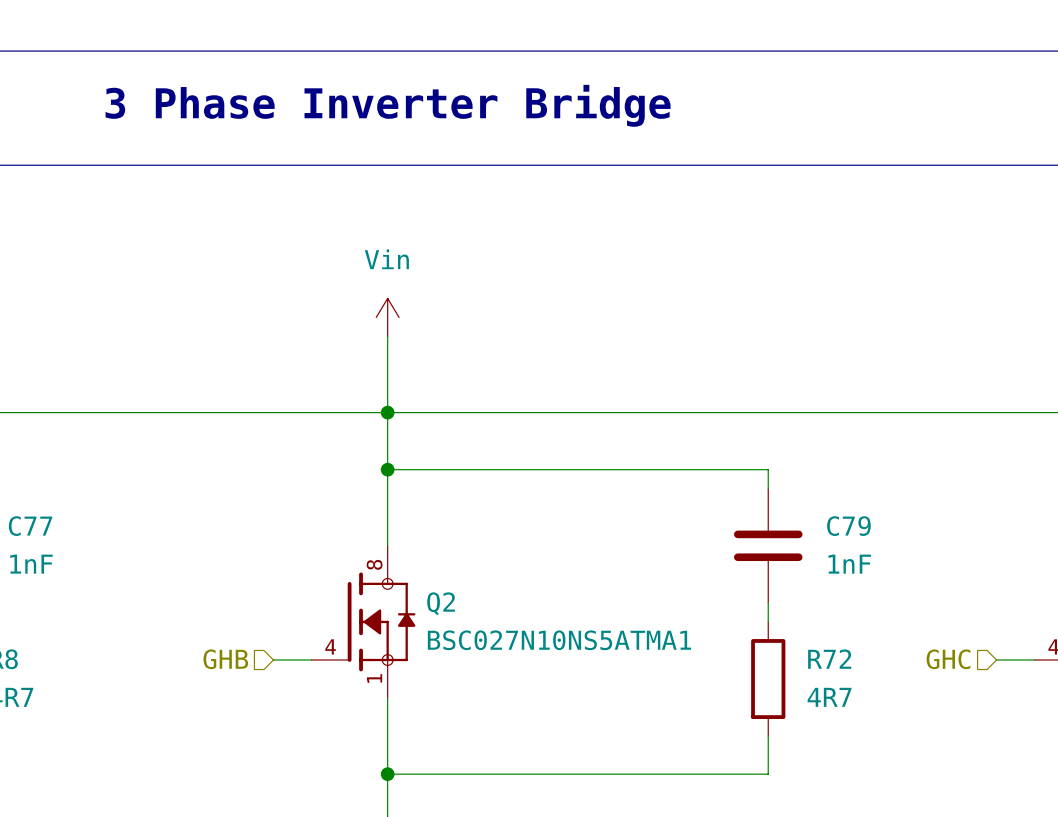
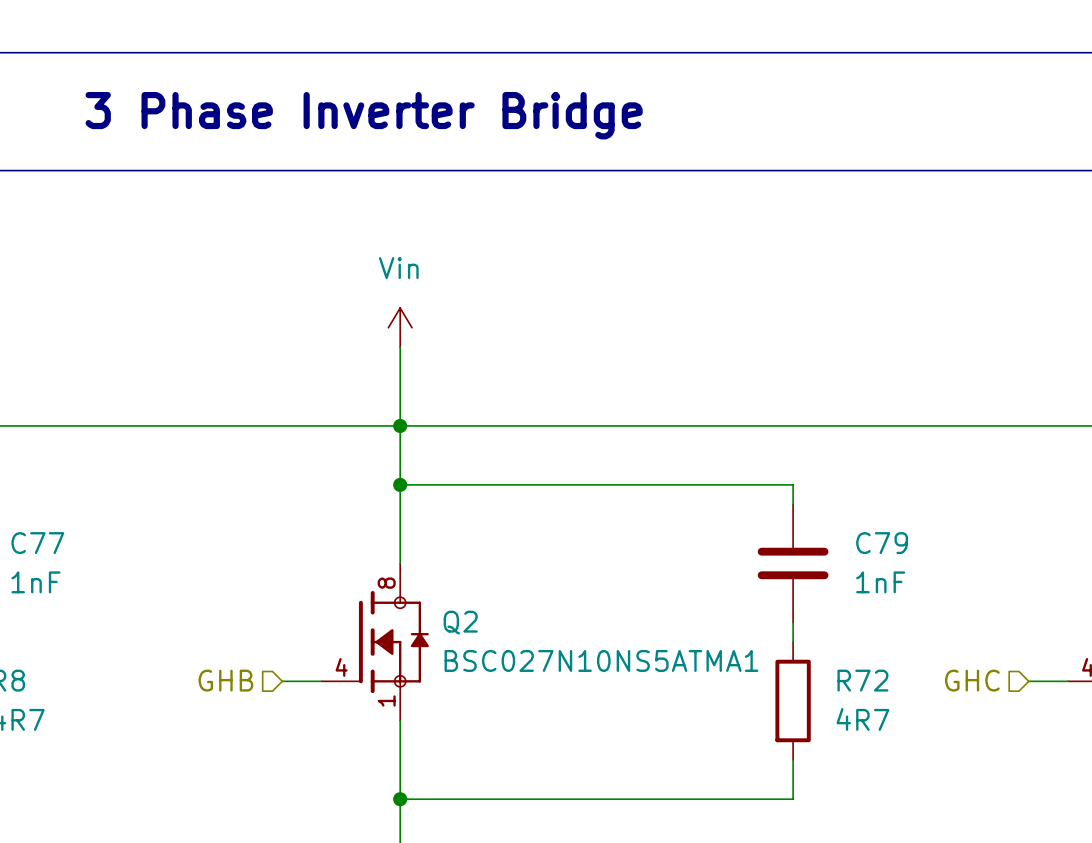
text position: 3 Phase Inverter Bridge (388, 105) -> 3 Phase Inverter Bridge (364, 115)

